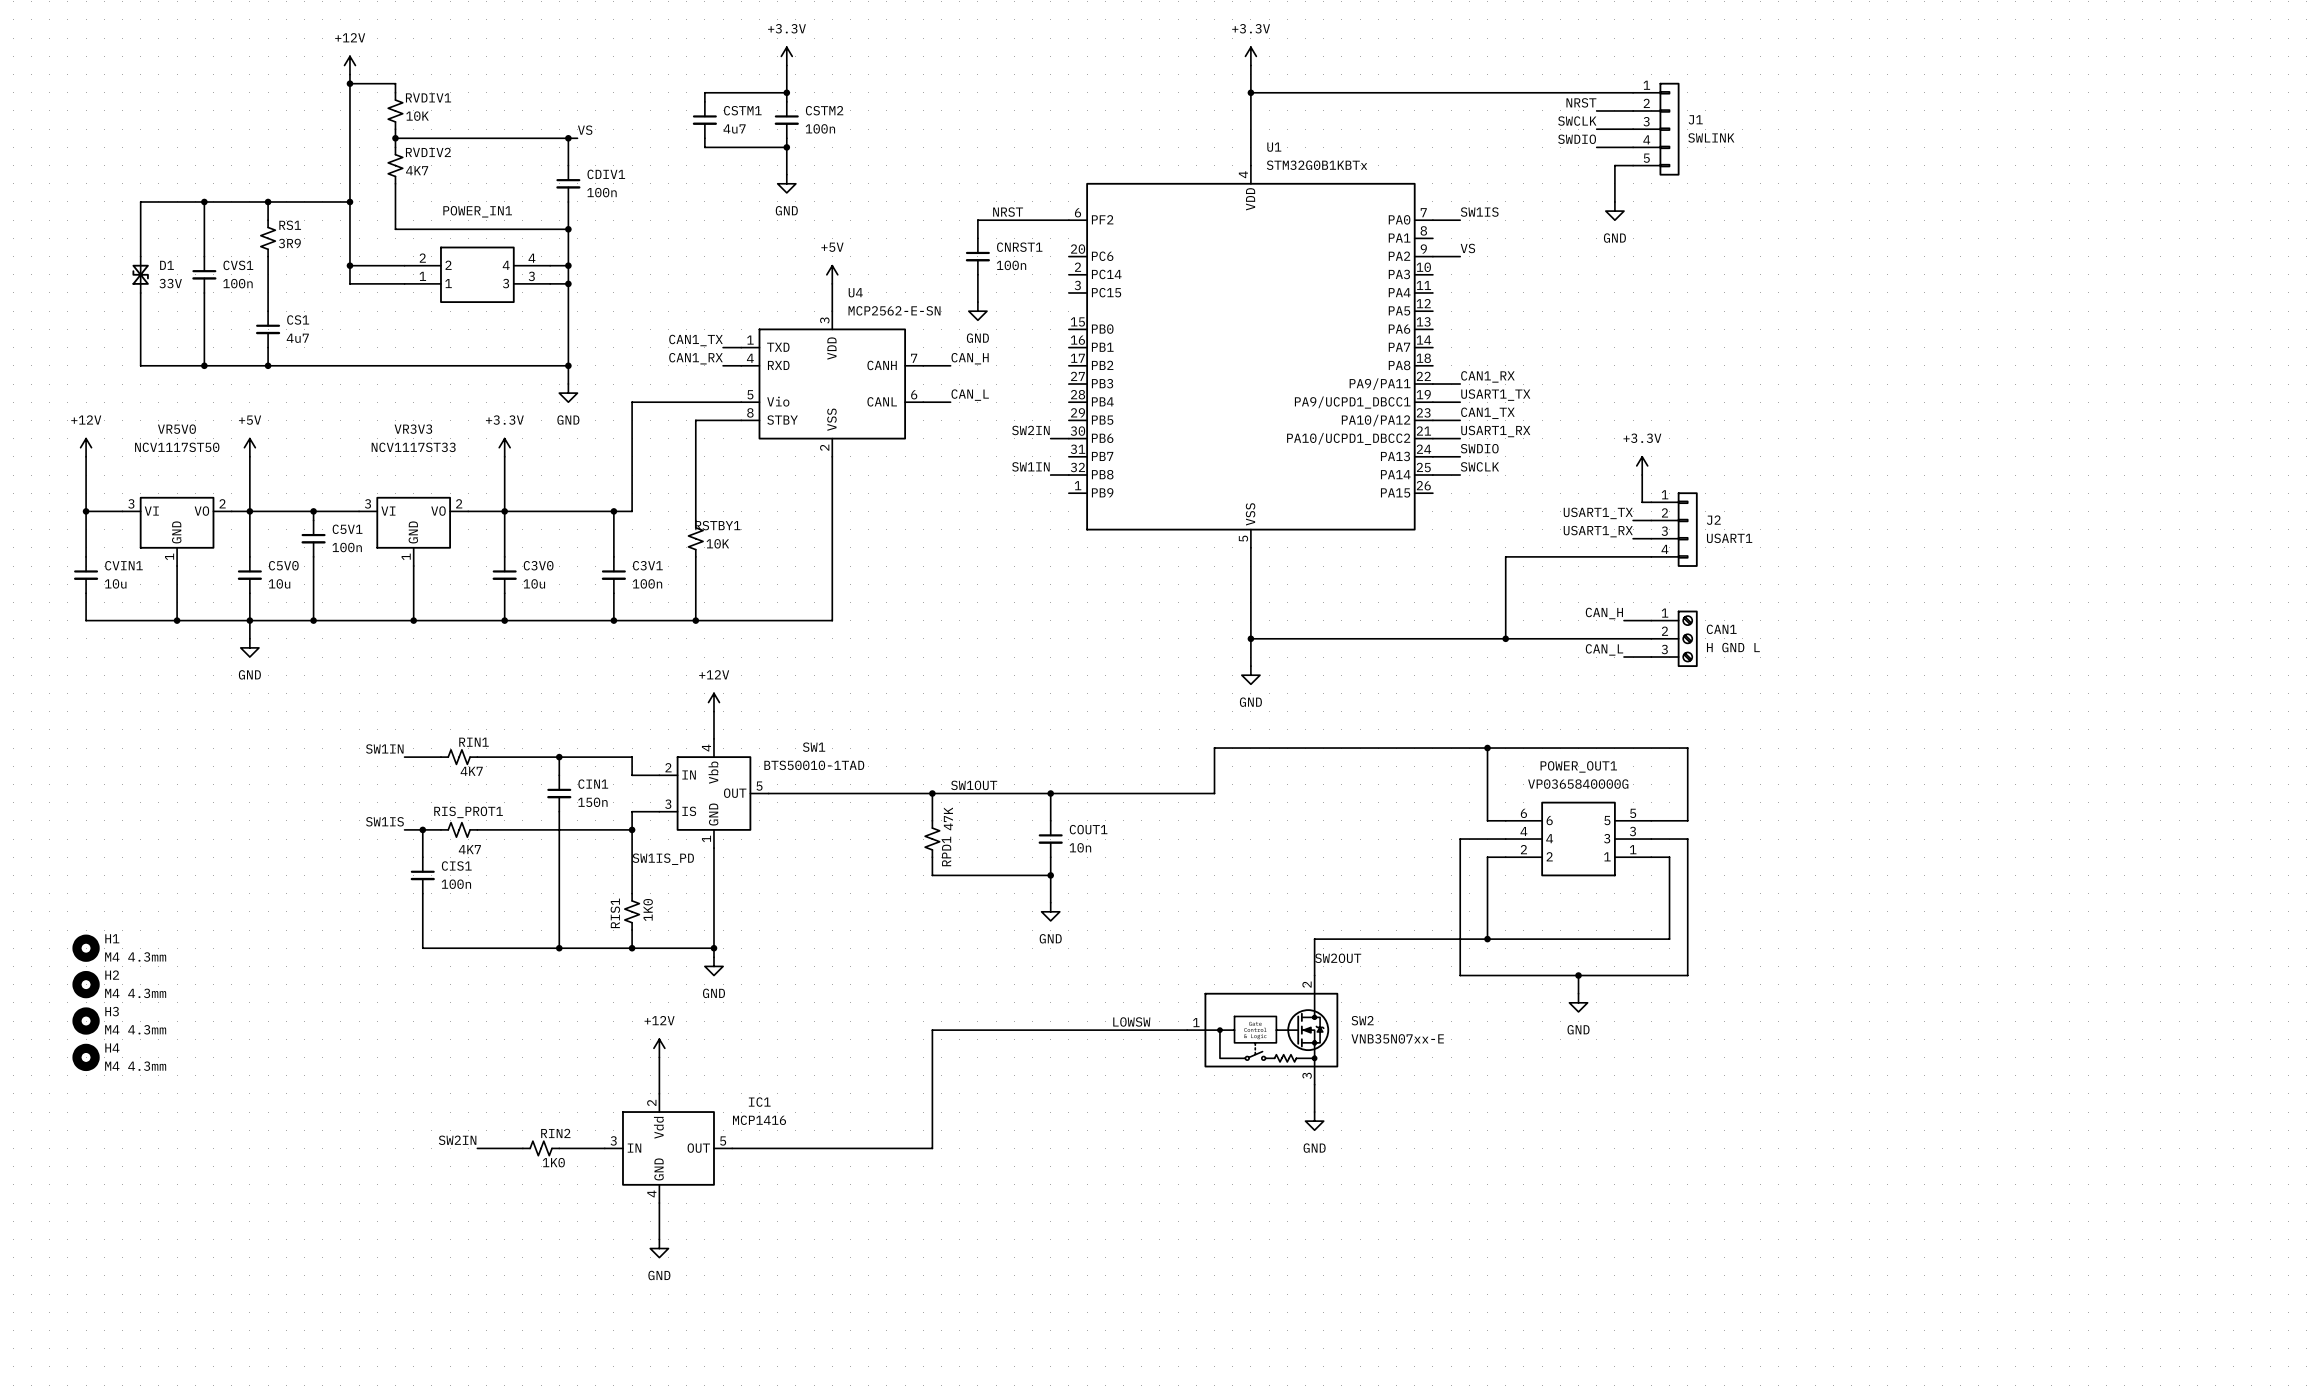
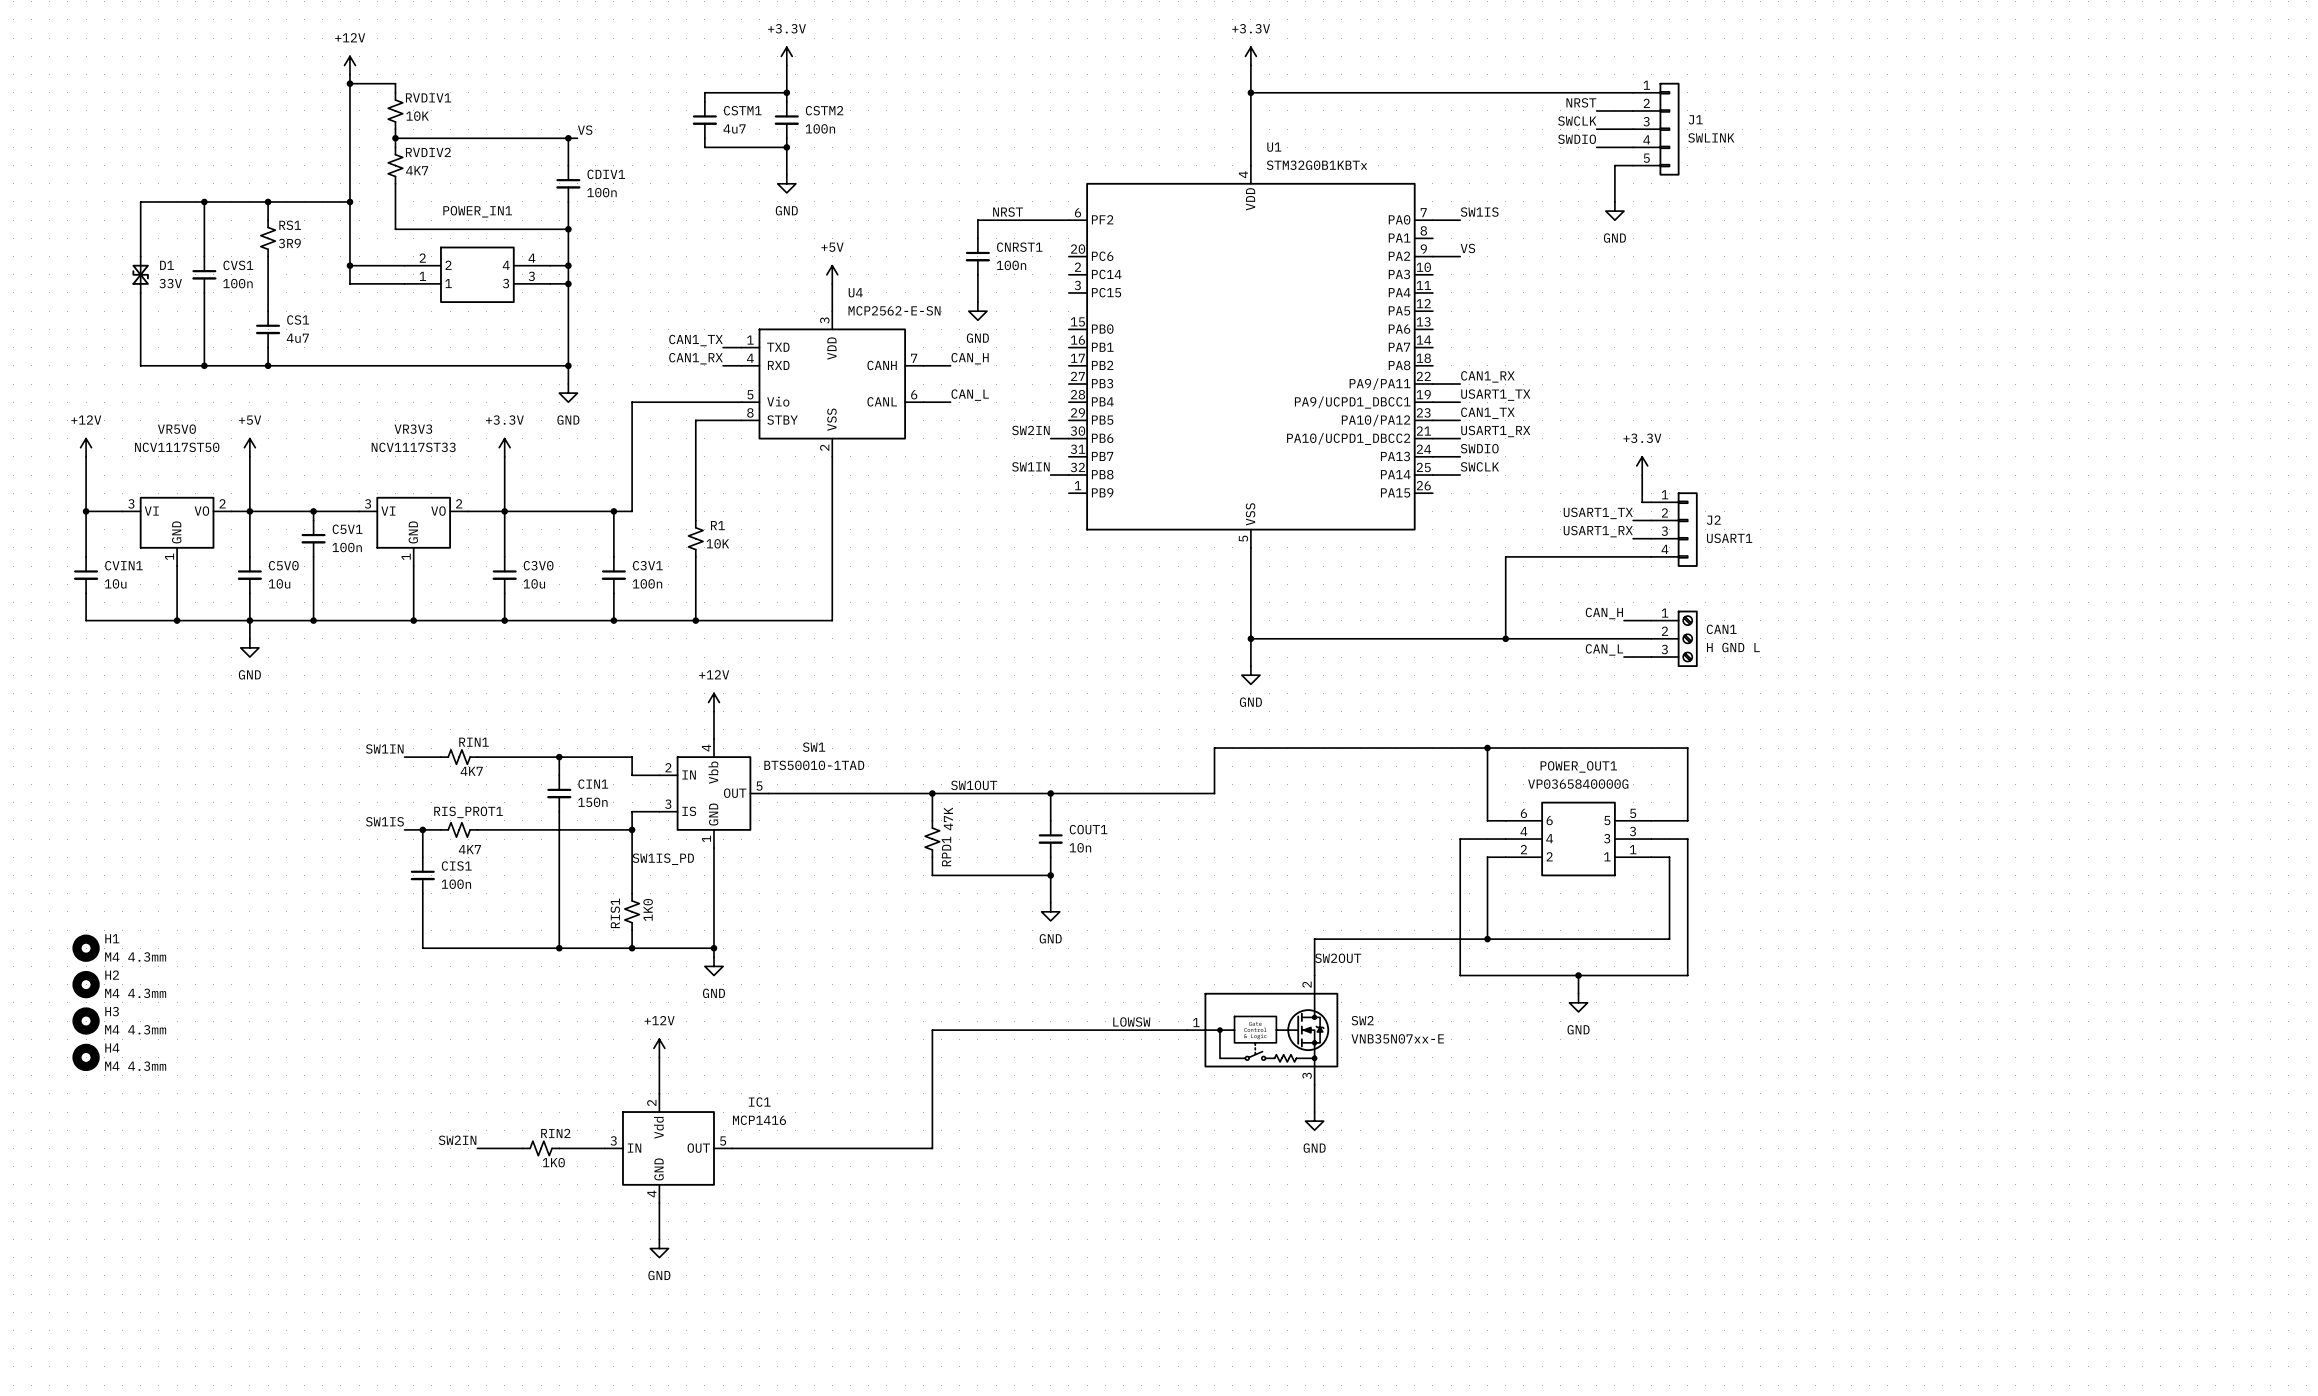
RSTBY1 name: RSTBY1 (717, 525) -> R1 (717, 525)

